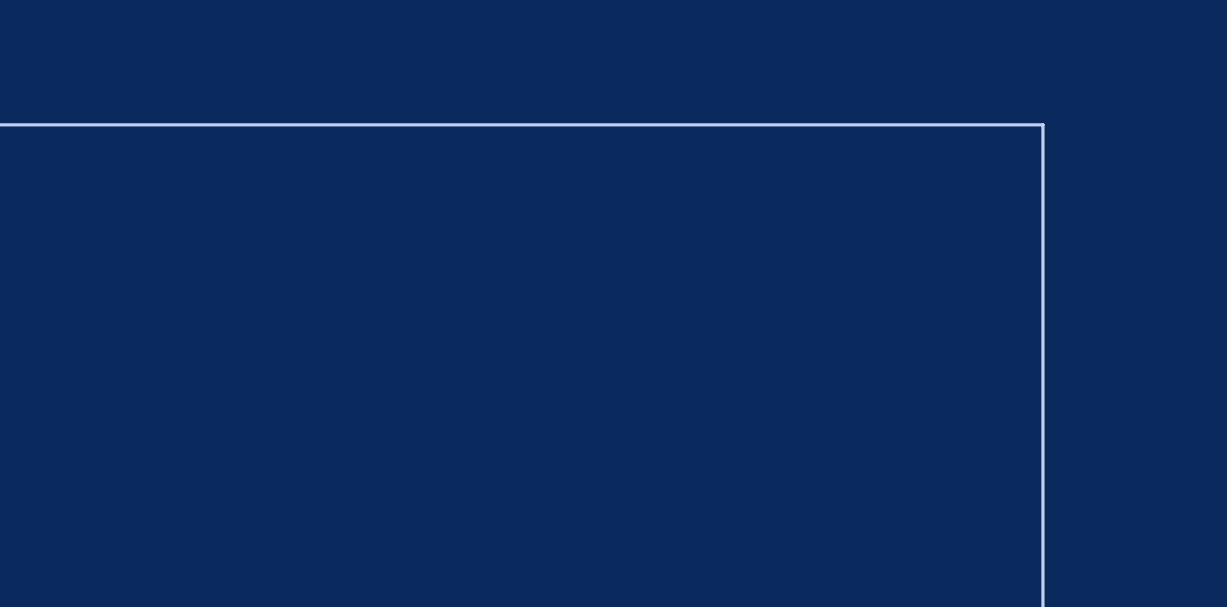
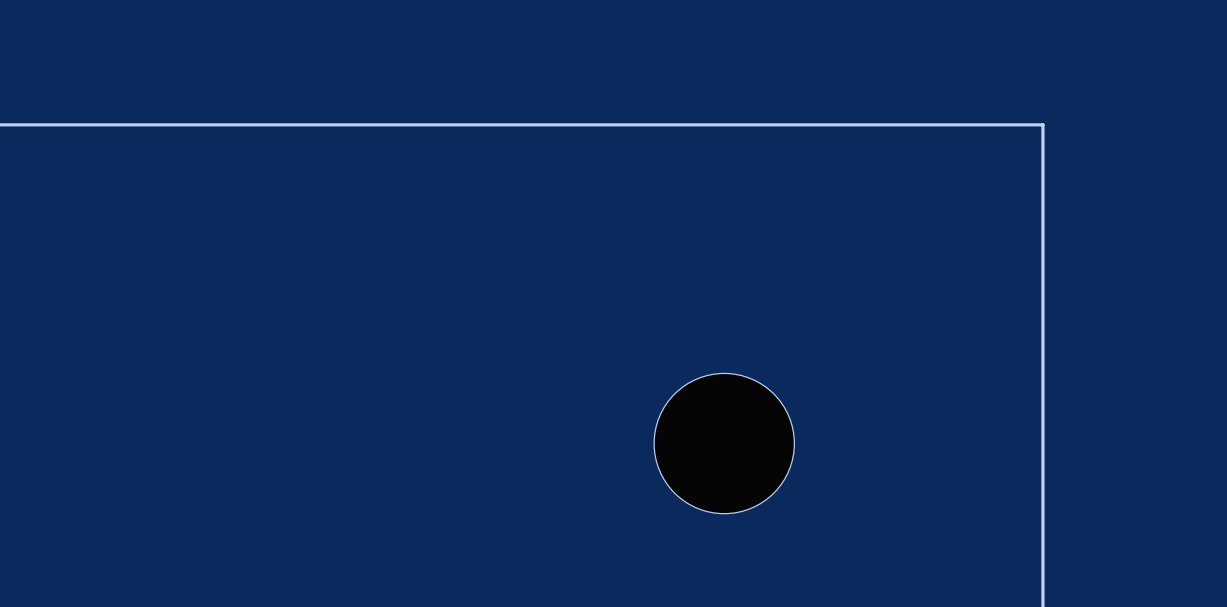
part: none -> (724, 443)

